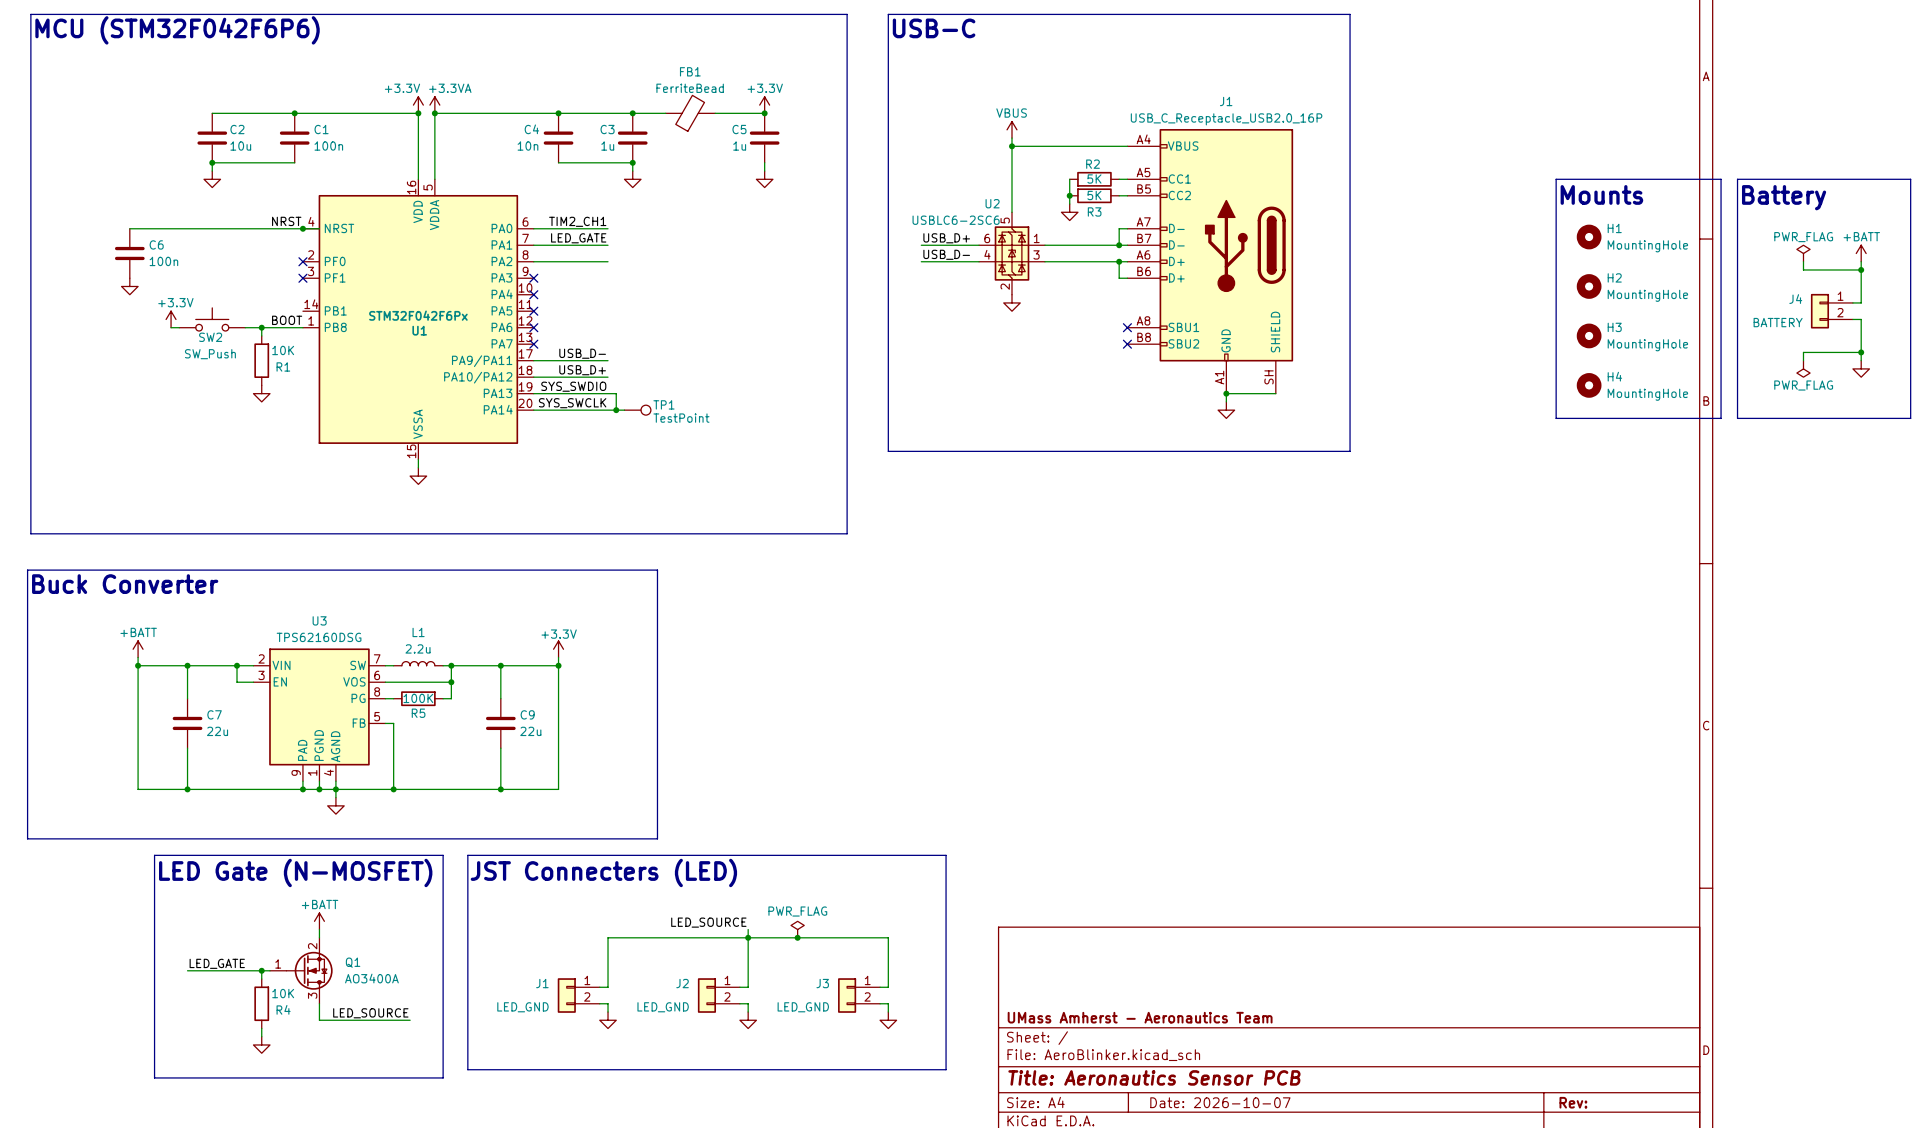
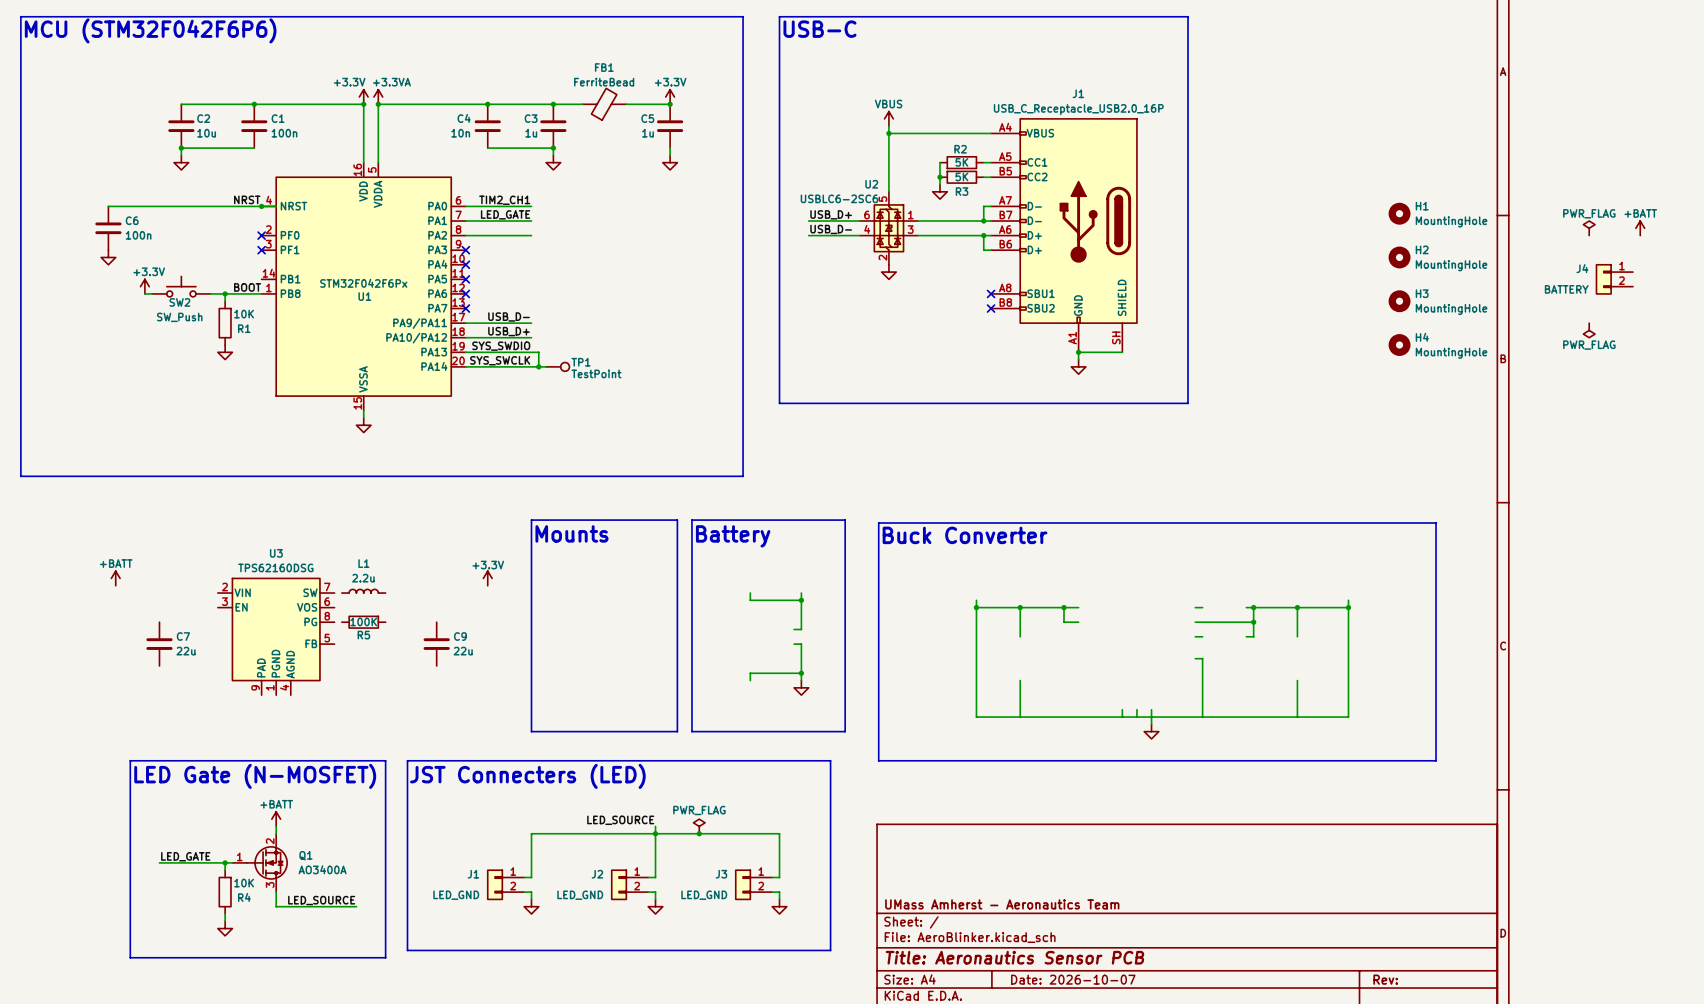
line: (1556, 179) (1721, 179) (1721, 418) (1556, 418) (1556, 179) -> none
line: (1737, 179) (1910, 179) (1910, 418) (1737, 418) (1737, 179) -> none
text: Mounts (1601, 194) -> none
text: Battery (1784, 197) -> none
wire: (1803, 261) (1803, 269) (1861, 269) -> none
wire: (1861, 261) (1861, 302) (1852, 302) -> none
junction: (1861, 269) -> none
wire: (1852, 319) (1861, 319) (1861, 360) -> none
wire: (1861, 352) (1803, 352) (1803, 360) -> none
junction: (1861, 352) -> none
power symbol: (1861, 368) -> none
line: (27, 570) (657, 570) (657, 838) (27, 838) (27, 570) -> none
line: none -> (531, 520) (677, 520) (677, 731) (531, 731) (531, 520)
line: none -> (691, 520) (845, 520) (845, 731) (691, 731) (691, 520)
text: Buck Converter (125, 584) -> none
line: none -> (878, 523) (1436, 523) (1436, 760) (878, 760) (878, 523)
text: none -> Mounts (571, 533)
text: none -> Buck Converter (965, 535)
text: none -> Battery (733, 536)
wire: (138, 657) (138, 789) (558, 789) (558, 657) -> none
wire: (138, 665) (253, 665) -> none
junction: (138, 665) -> none
wire: (187, 665) (187, 698) -> none
junction: (187, 665) -> none
wire: (237, 665) (237, 682) (253, 682) -> none
junction: (237, 665) -> none
wire: (385, 665) (393, 665) -> none
wire: (443, 665) (558, 665) -> none
wire: (451, 665) (451, 698) (443, 698) -> none
junction: (451, 665) -> none
wire: (500, 665) (500, 698) -> none
junction: (500, 665) -> none
junction: (558, 665) -> none
wire: none -> (750, 593) (750, 600) (801, 600)
wire: none -> (801, 593) (801, 629) (794, 629)
junction: none -> (801, 600)
wire: none -> (976, 600) (976, 717) (1348, 717) (1348, 600)
wire: (385, 682) (451, 682) -> none
junction: (451, 682) -> none
wire: none -> (976, 607) (1078, 607)
junction: none -> (976, 607)
wire: none -> (1020, 607) (1020, 636)
junction: none -> (1020, 607)
wire: none -> (1064, 607) (1064, 622) (1078, 622)
junction: none -> (1064, 607)
wire: none -> (1195, 607) (1202, 607)
wire: none -> (1246, 607) (1348, 607)
wire: none -> (1253, 607) (1253, 636) (1246, 636)
junction: none -> (1253, 607)
wire: none -> (1297, 607) (1297, 636)
junction: none -> (1297, 607)
junction: none -> (1348, 607)
wire: (385, 698) (393, 698) -> none
wire: none -> (1195, 622) (1253, 622)
junction: none -> (1253, 622)
wire: none -> (1195, 636) (1202, 636)
wire: (385, 723) (393, 723) (393, 789) -> none
wire: none -> (794, 644) (801, 644) (801, 680)
wire: none -> (1195, 658) (1202, 658) (1202, 717)
wire: (187, 748) (187, 789) -> none
wire: (500, 748) (500, 789) -> none
wire: none -> (801, 673) (750, 673) (750, 680)
junction: none -> (801, 673)
wire: none -> (1020, 680) (1020, 717)
wire: none -> (1297, 680) (1297, 717)
power symbol: none -> (801, 687)
wire: (302, 781) (302, 789) -> none
wire: (319, 781) (319, 789) -> none
wire: (335, 781) (335, 797) -> none
junction: (187, 789) -> none
junction: (302, 789) -> none
junction: (319, 789) -> none
junction: (335, 789) -> none
junction: (393, 789) -> none
junction: (500, 789) -> none
wire: none -> (1122, 709) (1122, 717)
wire: none -> (1136, 709) (1136, 717)
wire: none -> (1151, 709) (1151, 724)
power symbol: (335, 805) -> none
power symbol: none -> (1151, 731)

